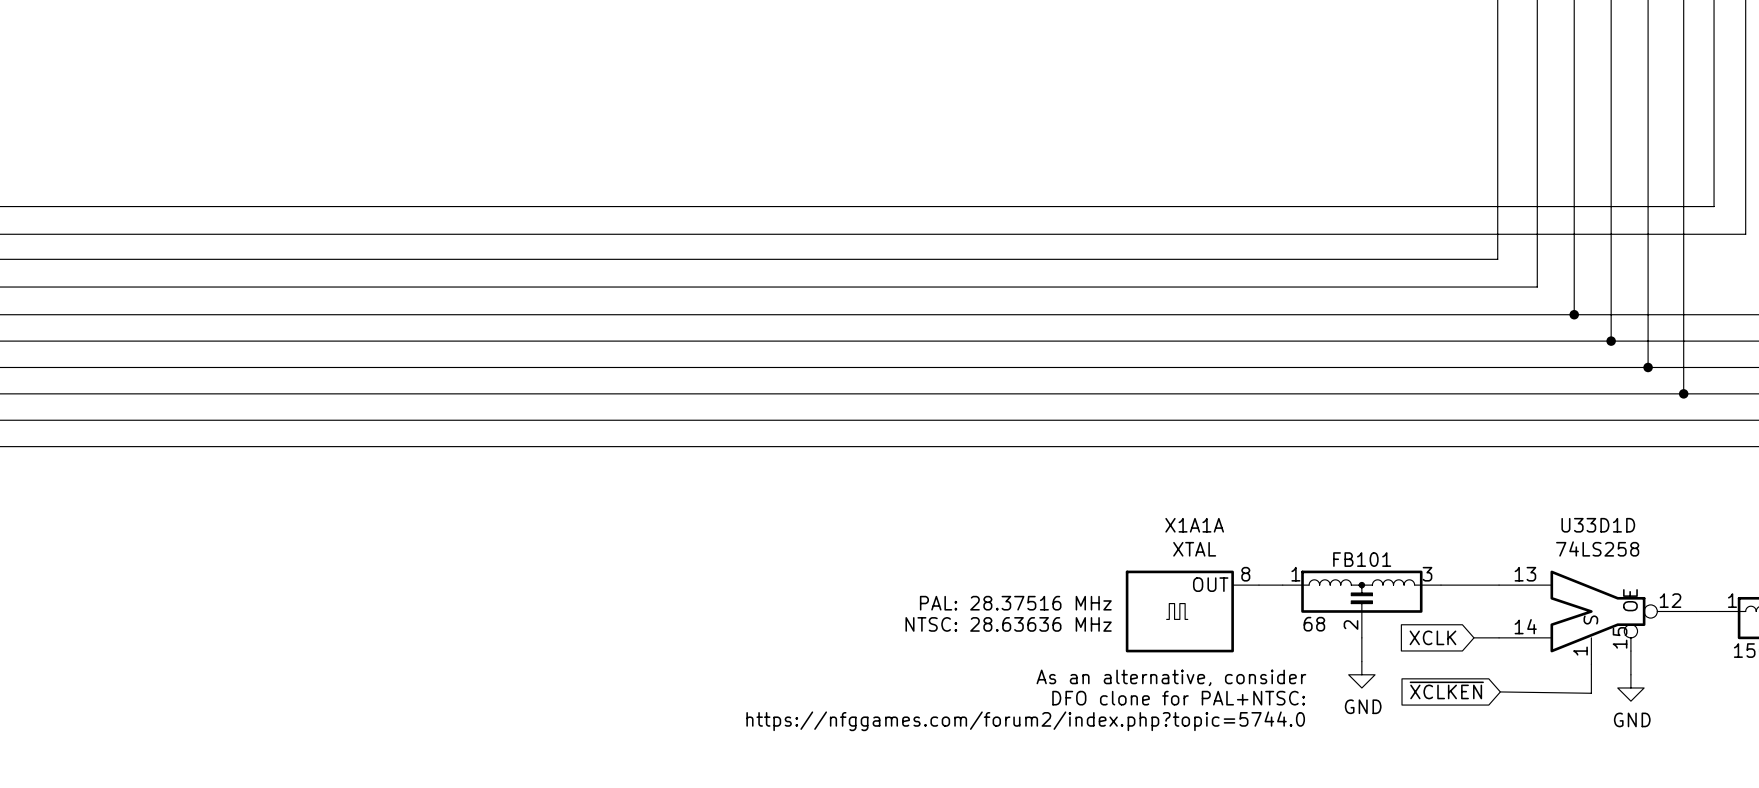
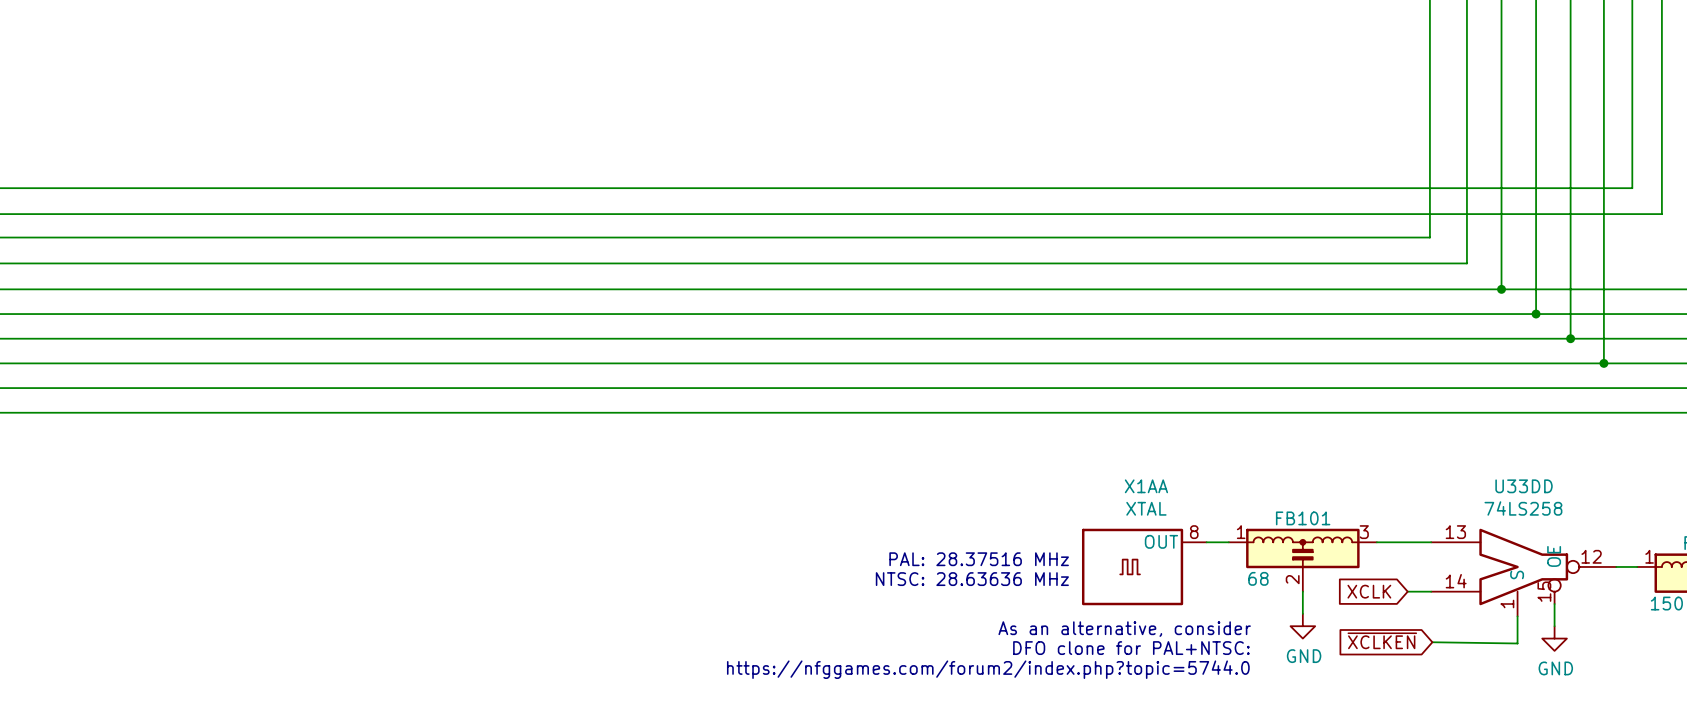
X1A1A name: X1A1A (1194, 525) -> X1AA (1146, 486)
U33D1D name: U33D1D (1598, 525) -> U33DD (1524, 486)

